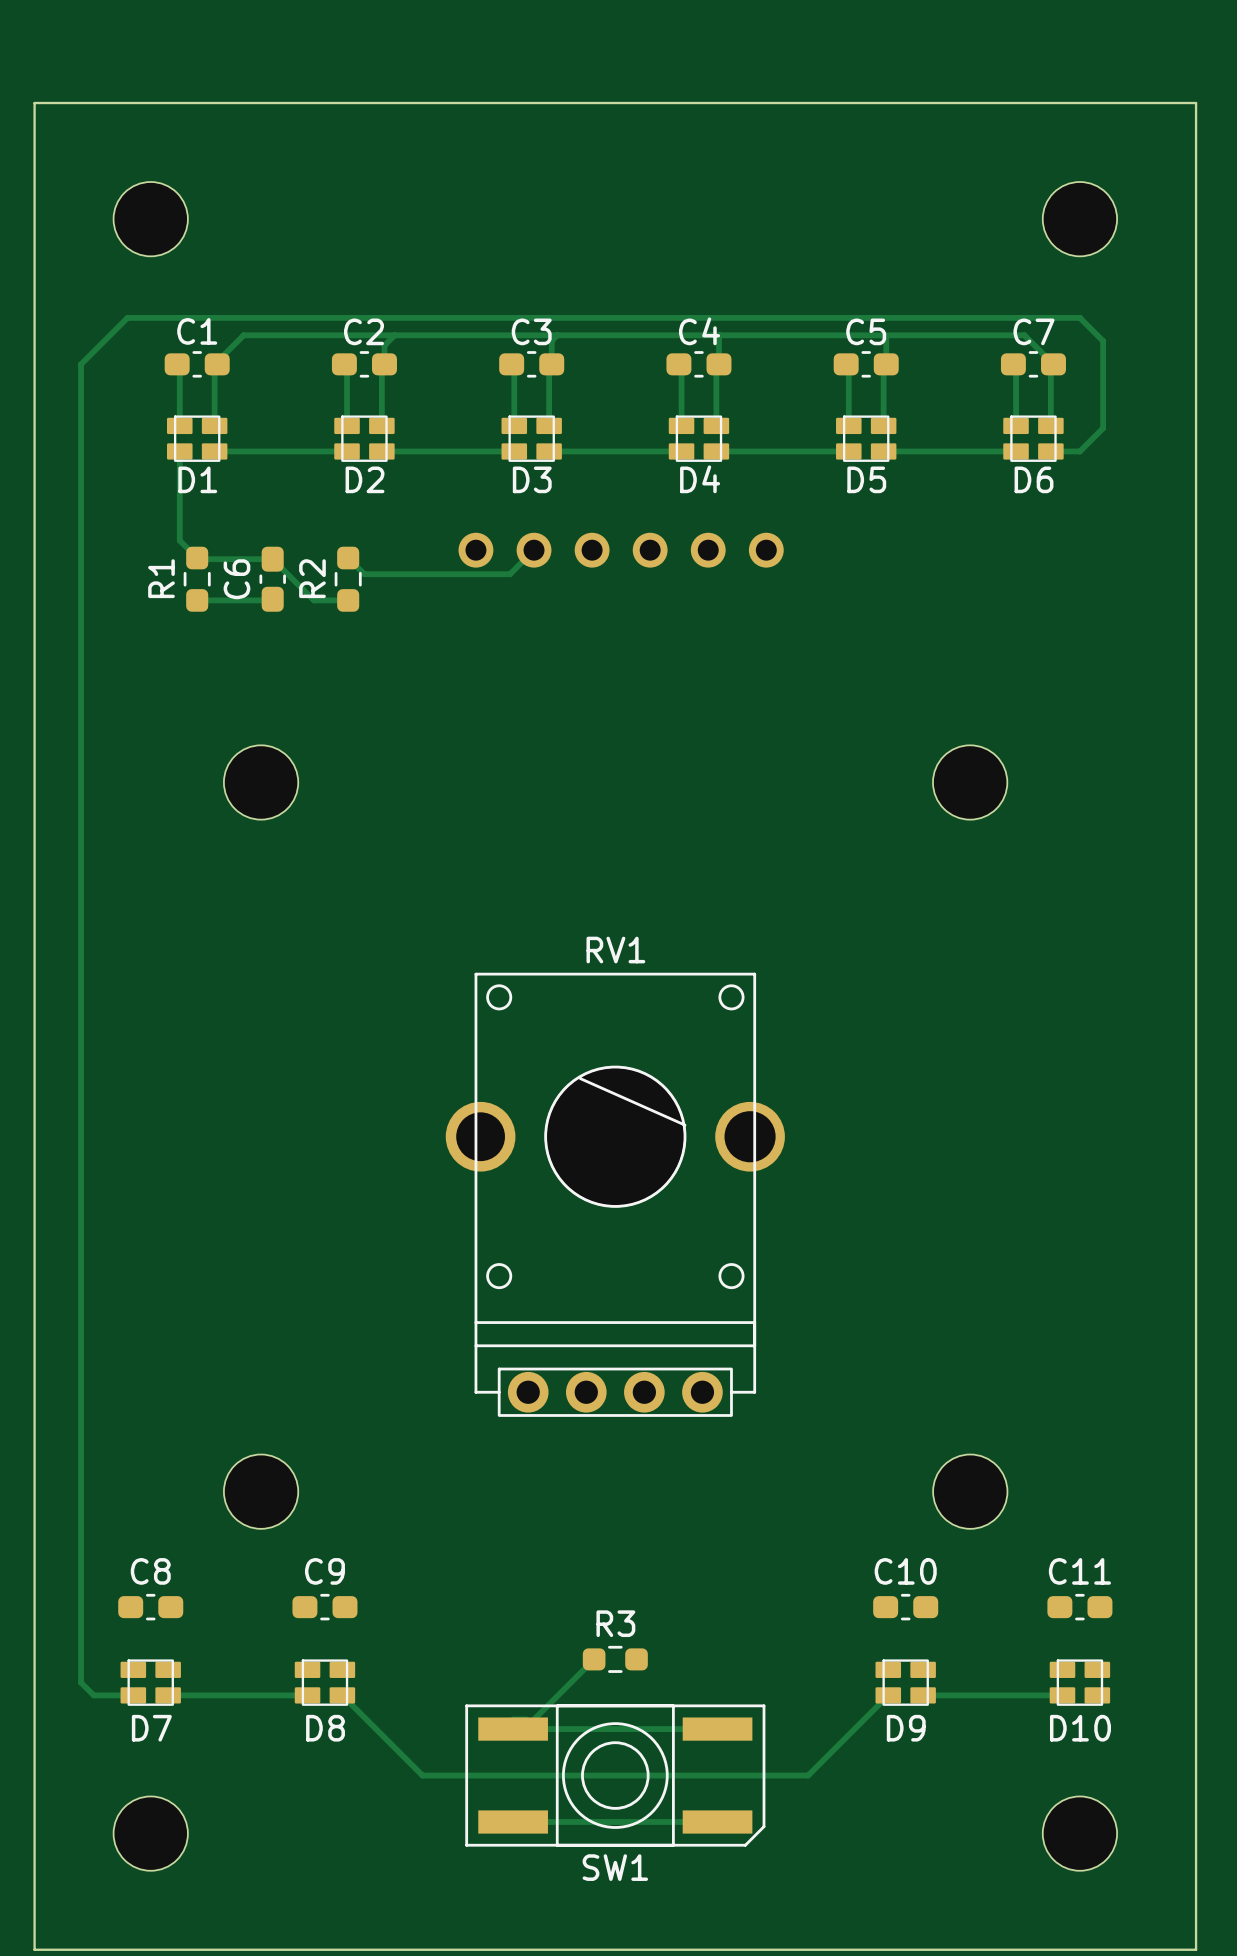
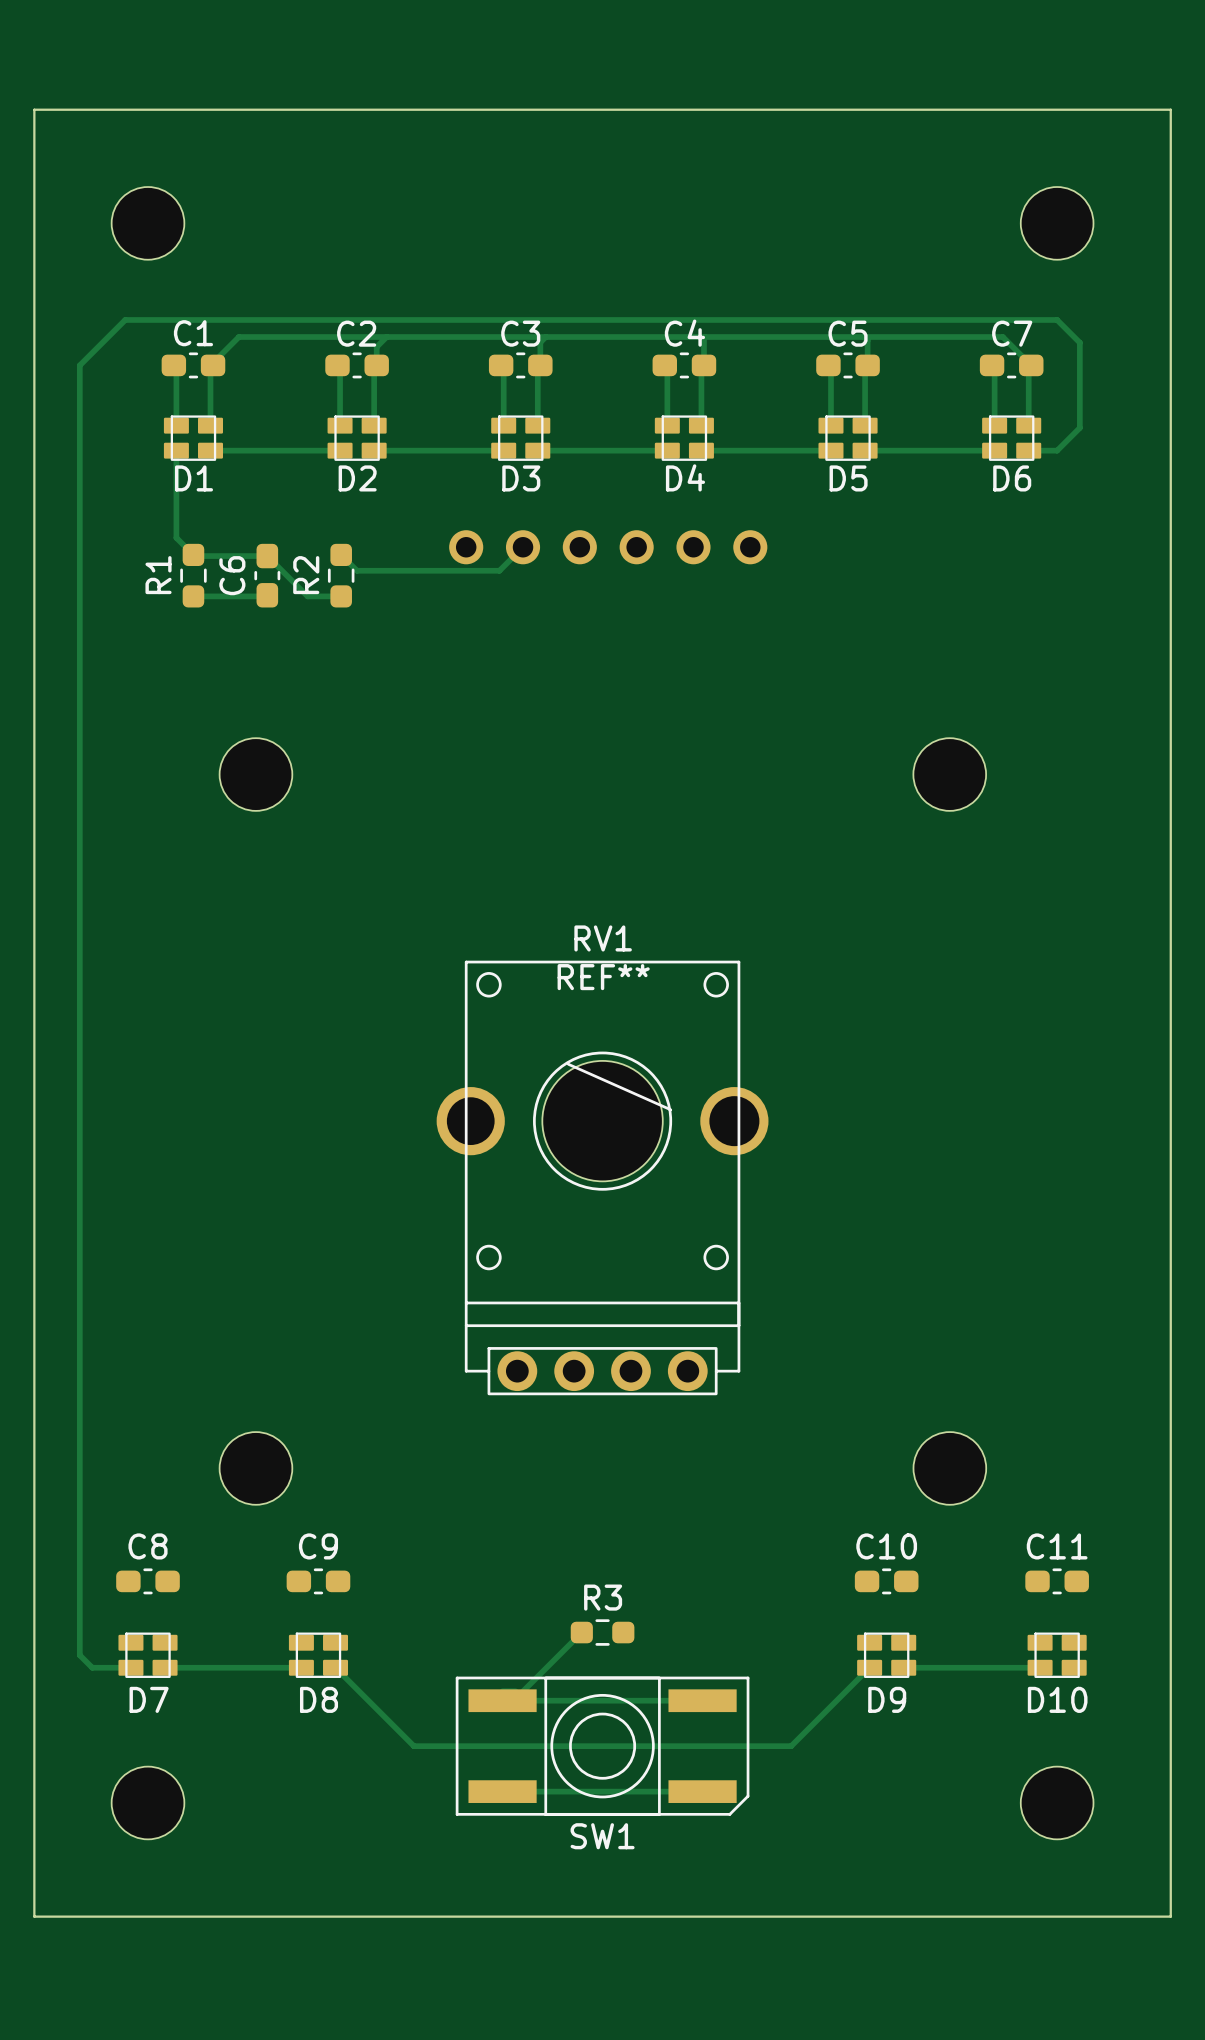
RV1 footprint: [445, 972, 785, 1417] -> [436, 960, 769, 1396]
REF**: none -> (602, 1121)

